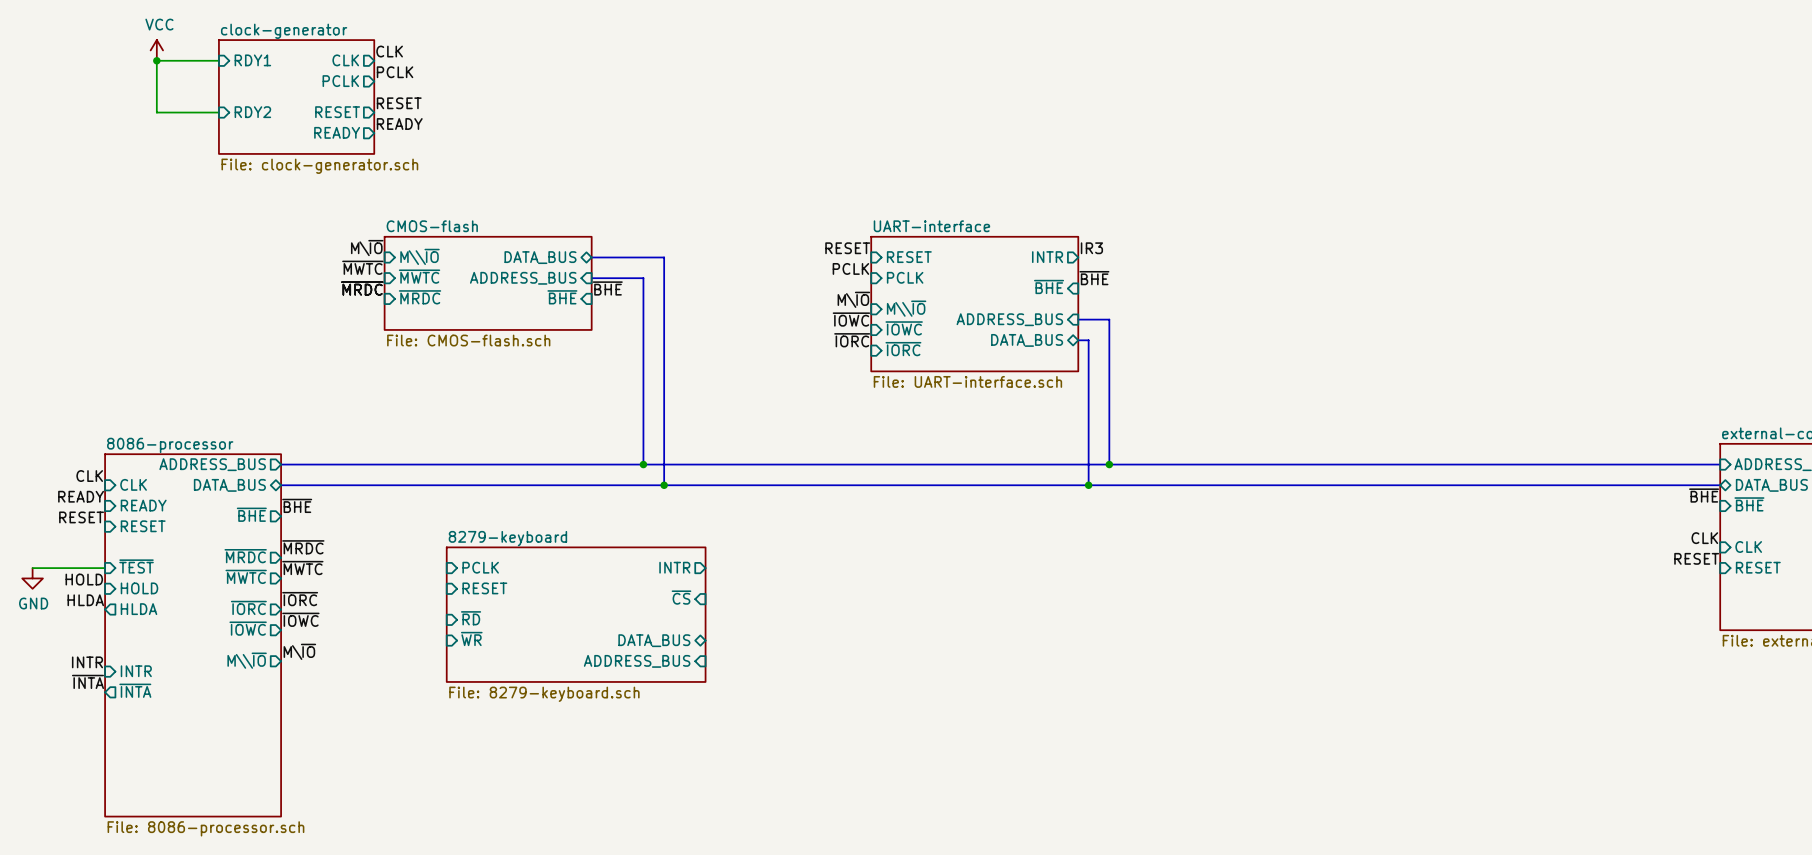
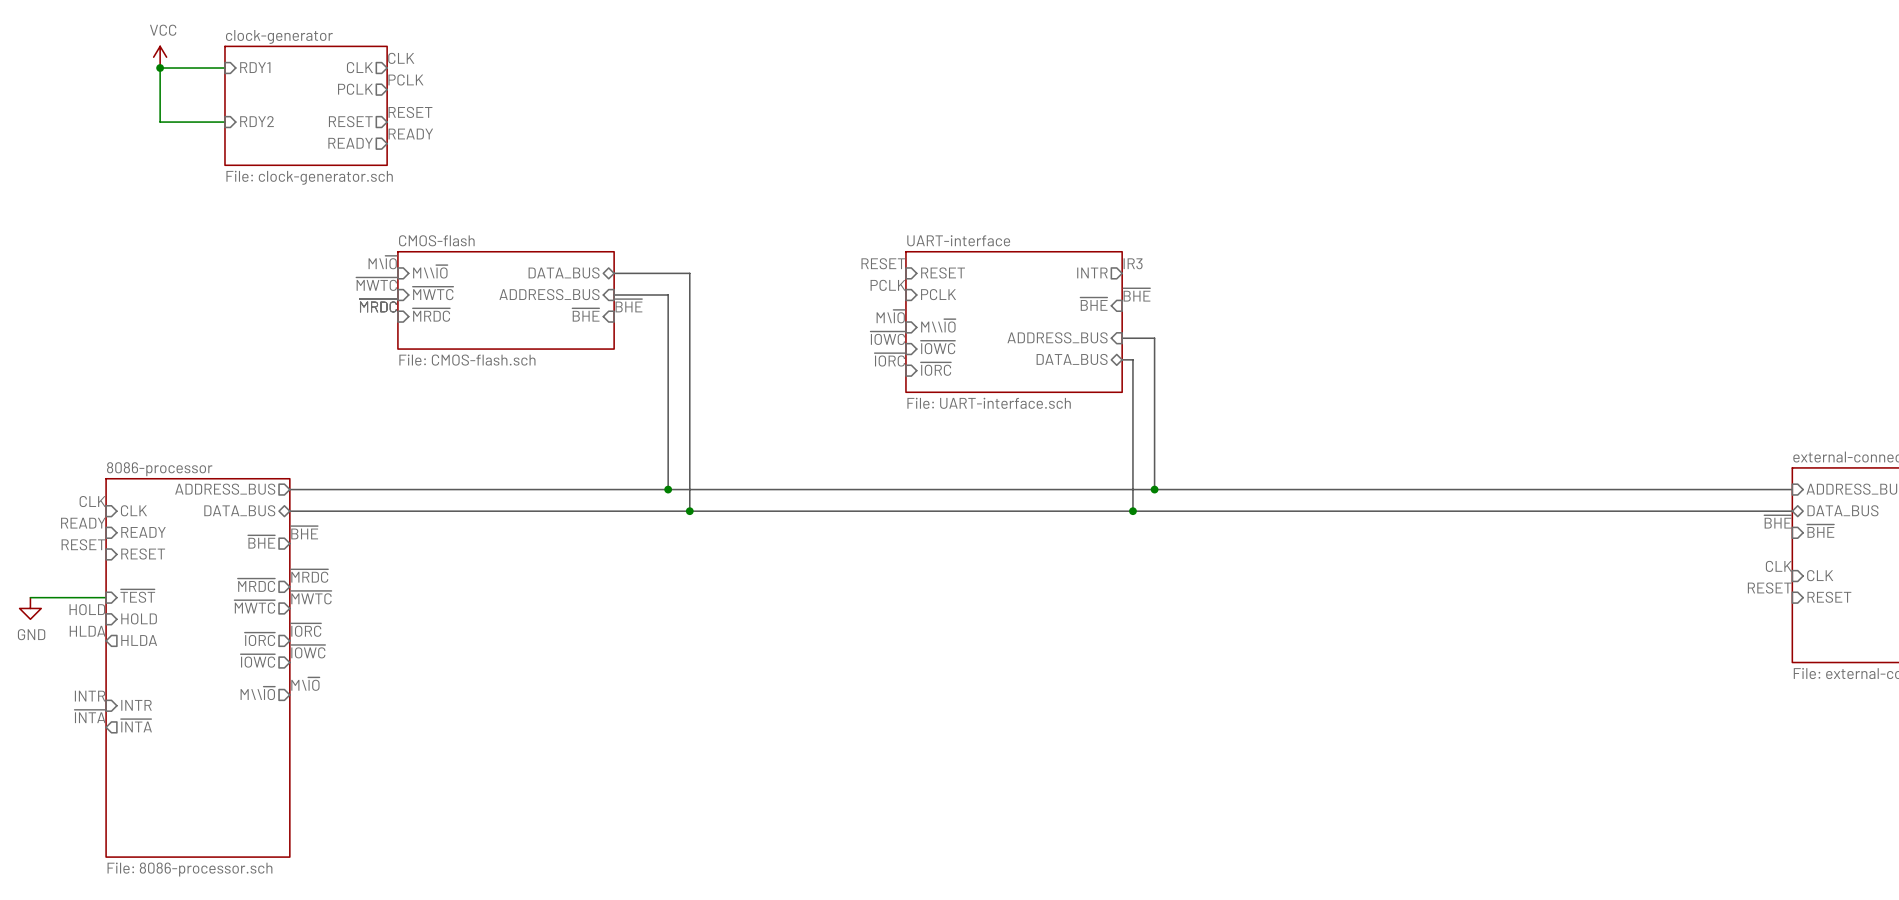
sheet pin: PCLK (480, 567) -> none
sheet pin: INTR (674, 567) -> none
sheet pin: RESET (484, 588) -> none
sheet pin: ~{CS} (681, 597) -> none
sheet 8279-keyboard: File: 8279-keyboard.sch (576, 614) -> none
sheet pin: ~{RD} (471, 618) -> none
sheet pin: ~{WR} (471, 638) -> none
sheet pin: DATA_BUS (654, 640) -> none
sheet pin: ADDRESS_BUS (637, 661) -> none

